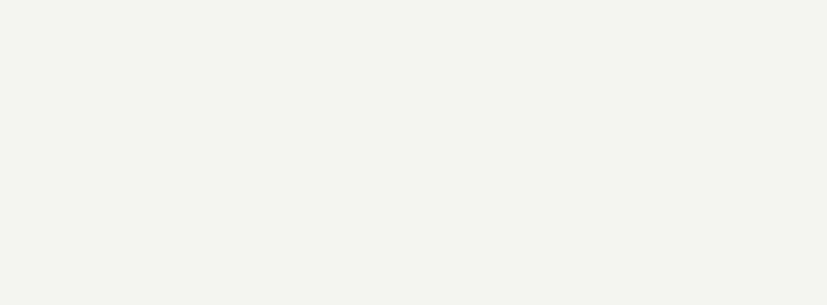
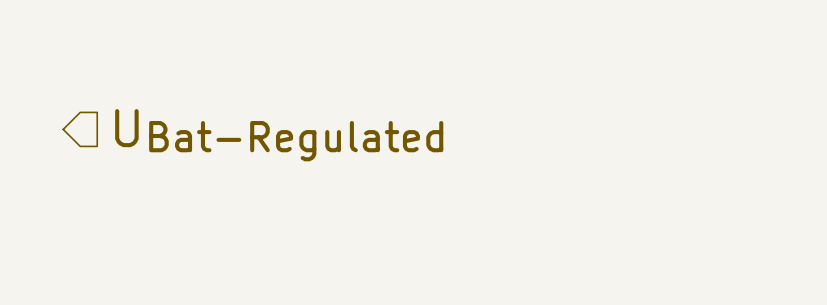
hierarchical label: none -> UBat-Regulated (279, 135)

